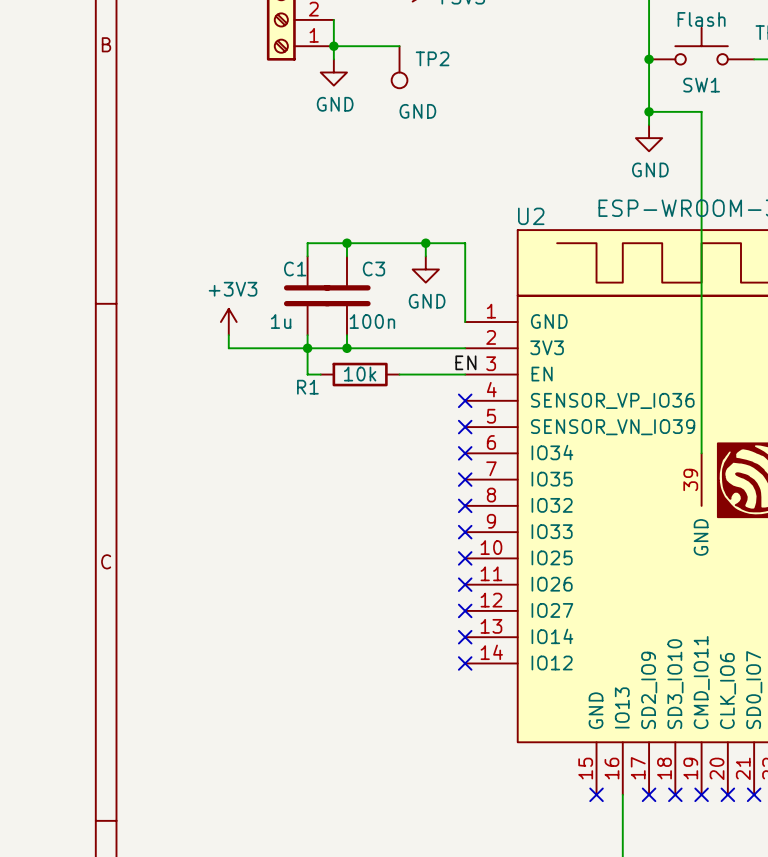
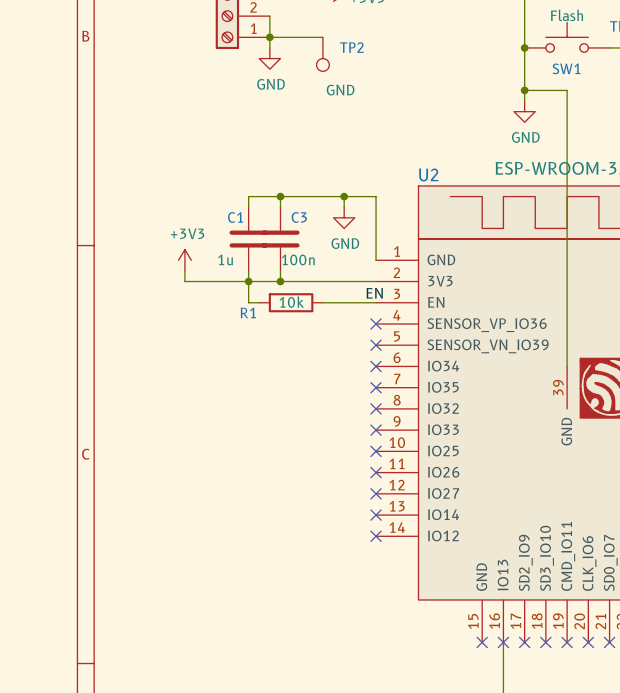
no-connect mark: none -> (503, 642)

